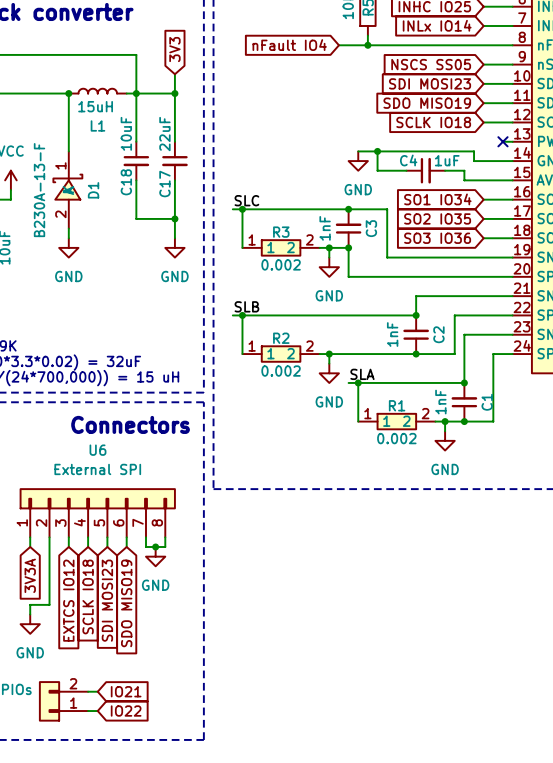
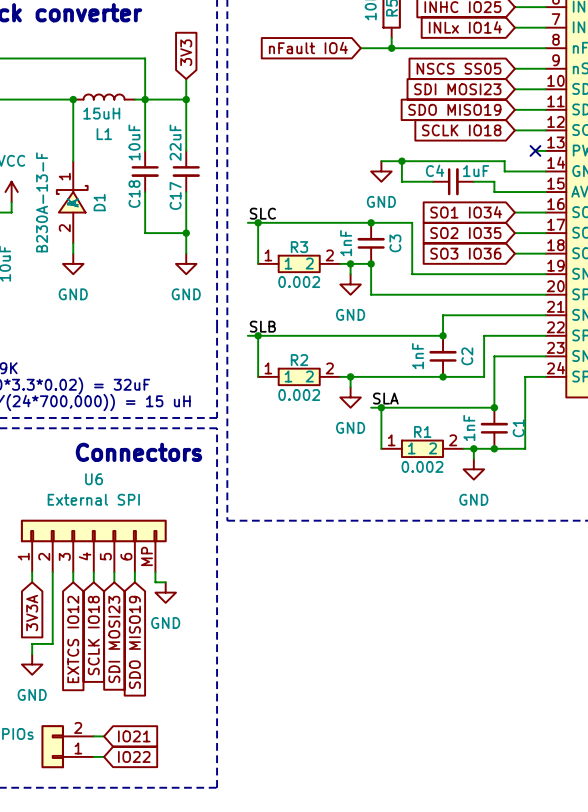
U6 symbol: [19, 488, 176, 538] -> [20, 519, 167, 573]
wire: (165, 537) (165, 547) (155, 547) -> none
junction: (155, 547) -> none

